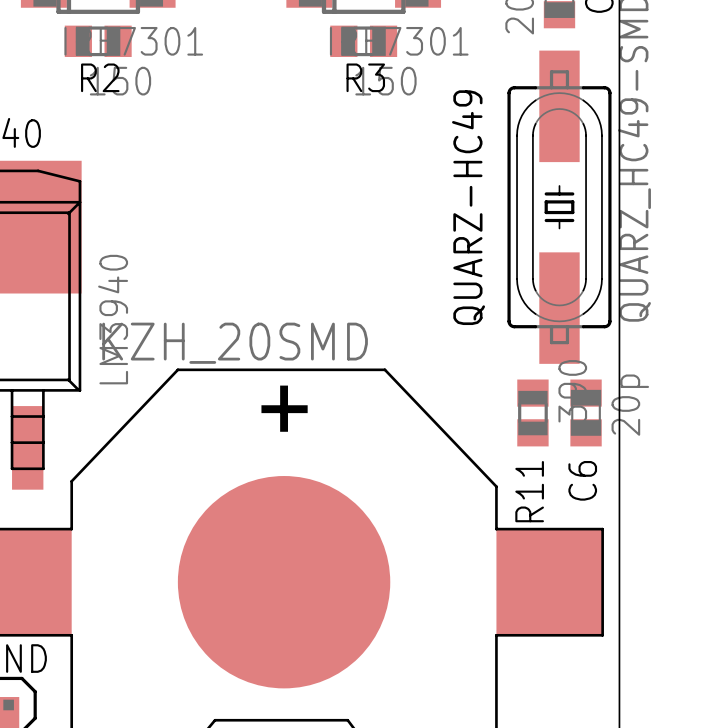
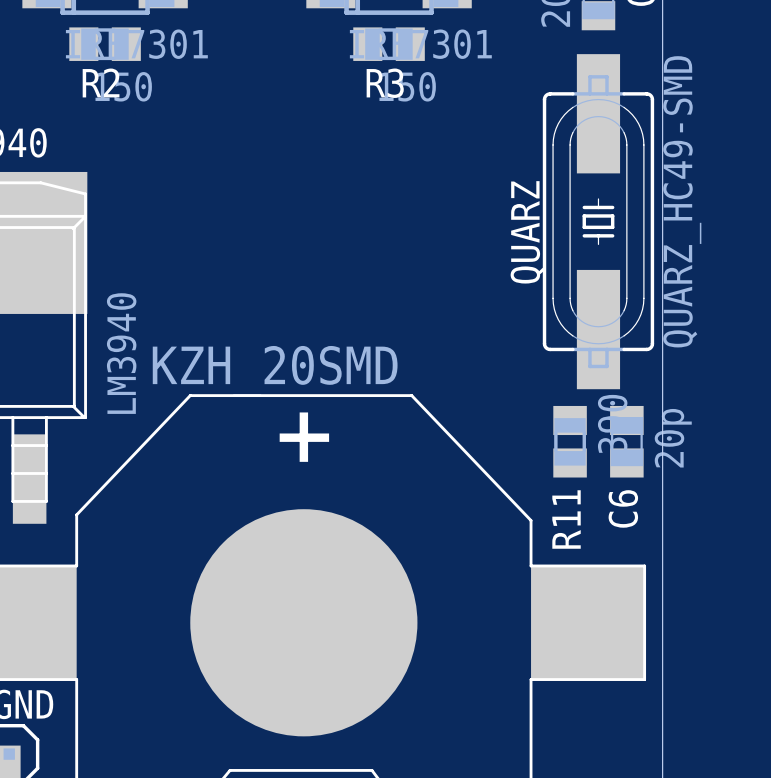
QUARZ-HC49 name: QUARZ-HC49 (468, 207) -> QUARZ (527, 232)

